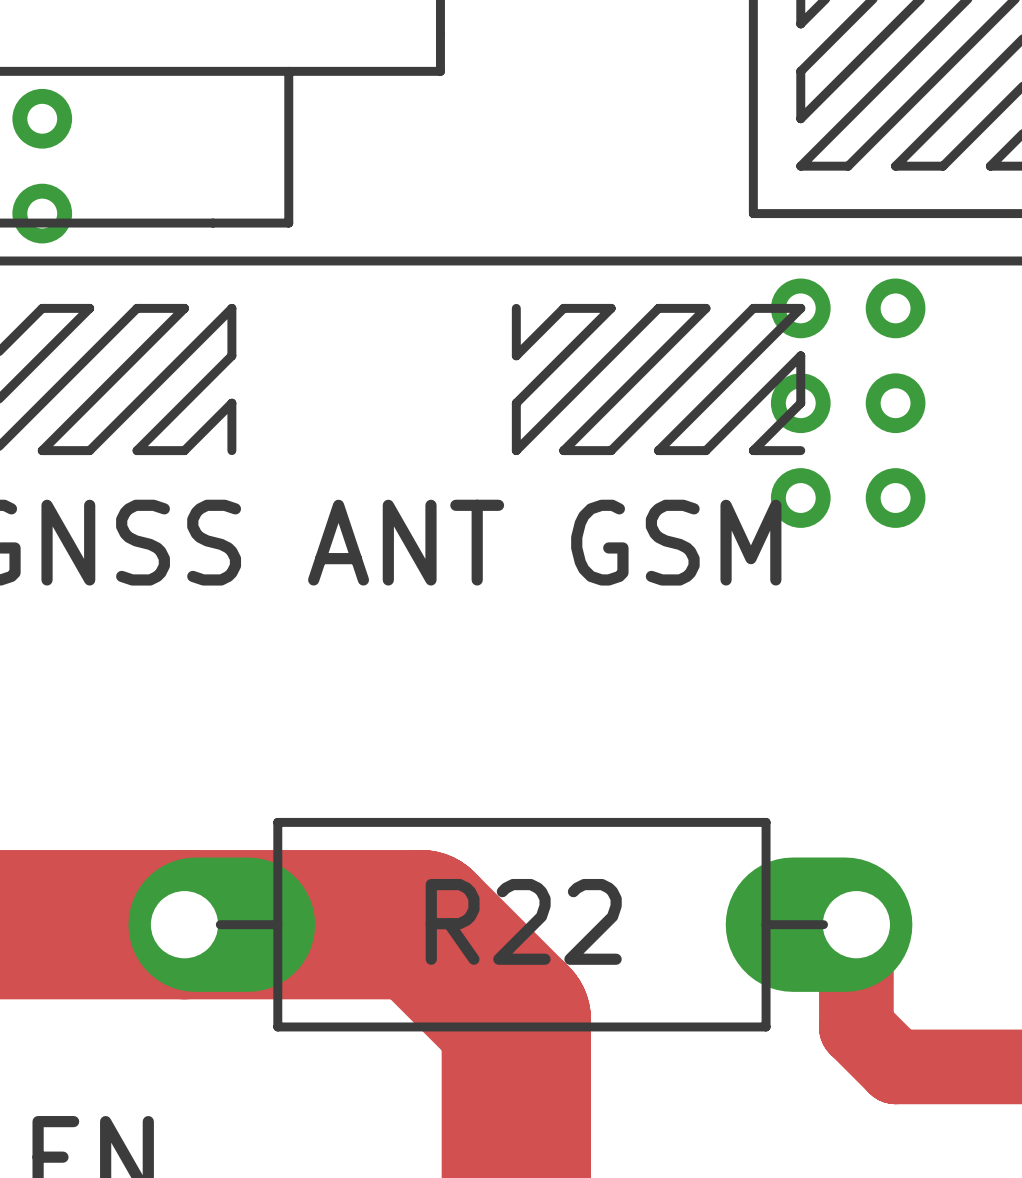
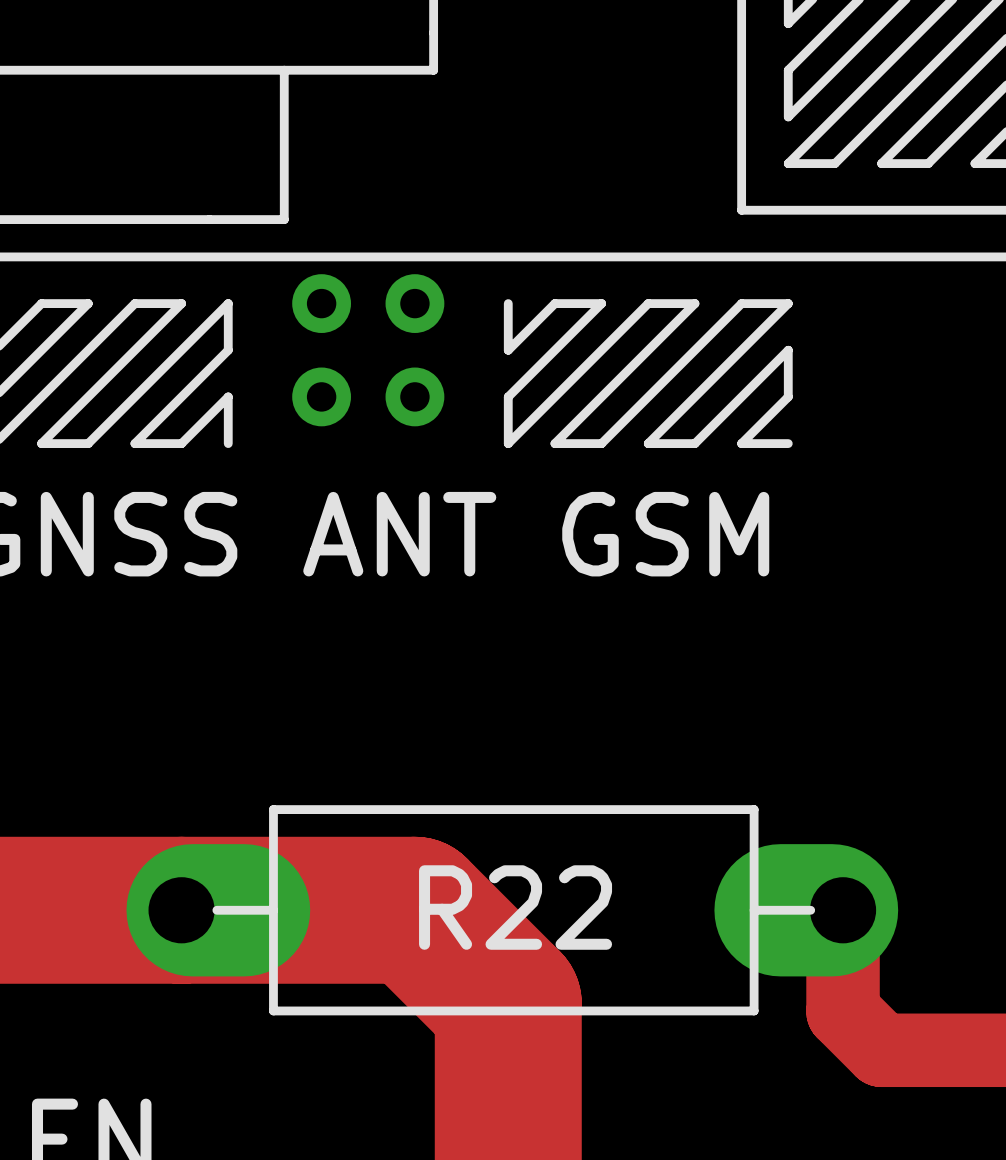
via: (42, 118) -> none
via: (42, 213) -> none
via: none -> (321, 303)
via: none -> (414, 303)
via: (800, 308) -> none
via: (895, 308) -> none
via: none -> (321, 396)
via: none -> (414, 396)
via: (800, 403) -> none
via: (895, 403) -> none
via: (800, 498) -> none
via: (895, 498) -> none

